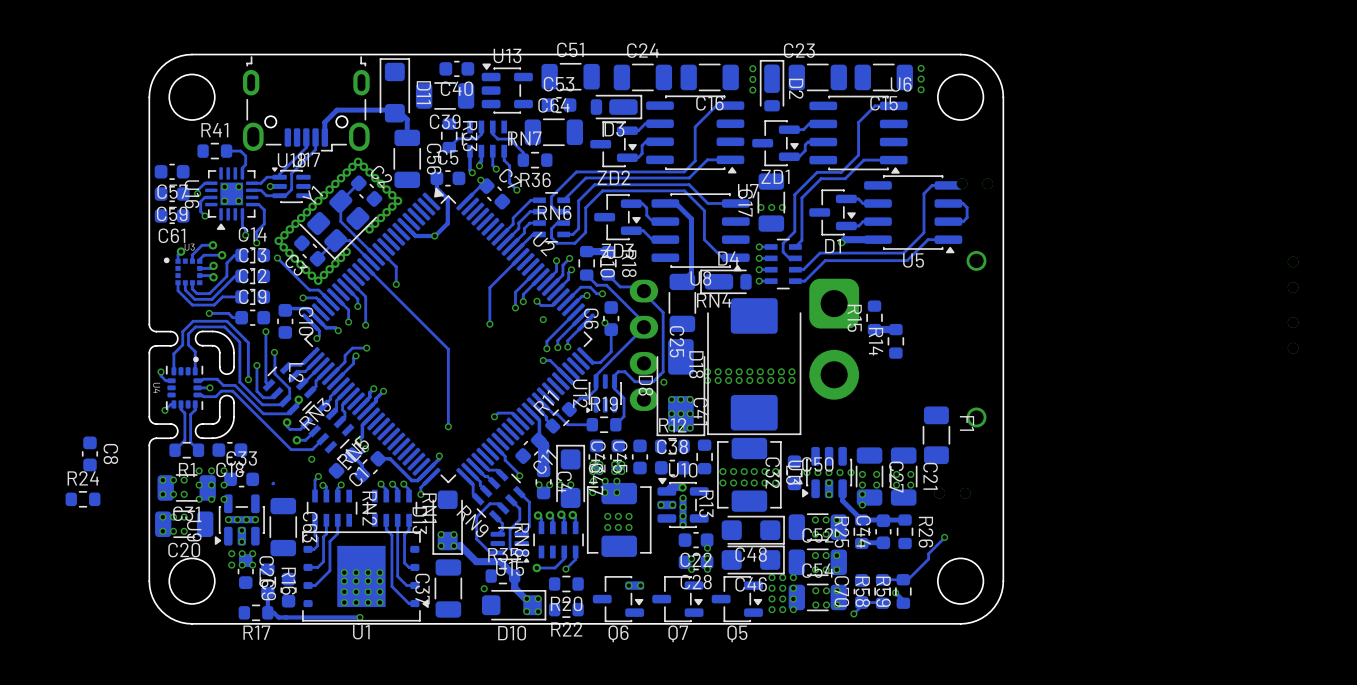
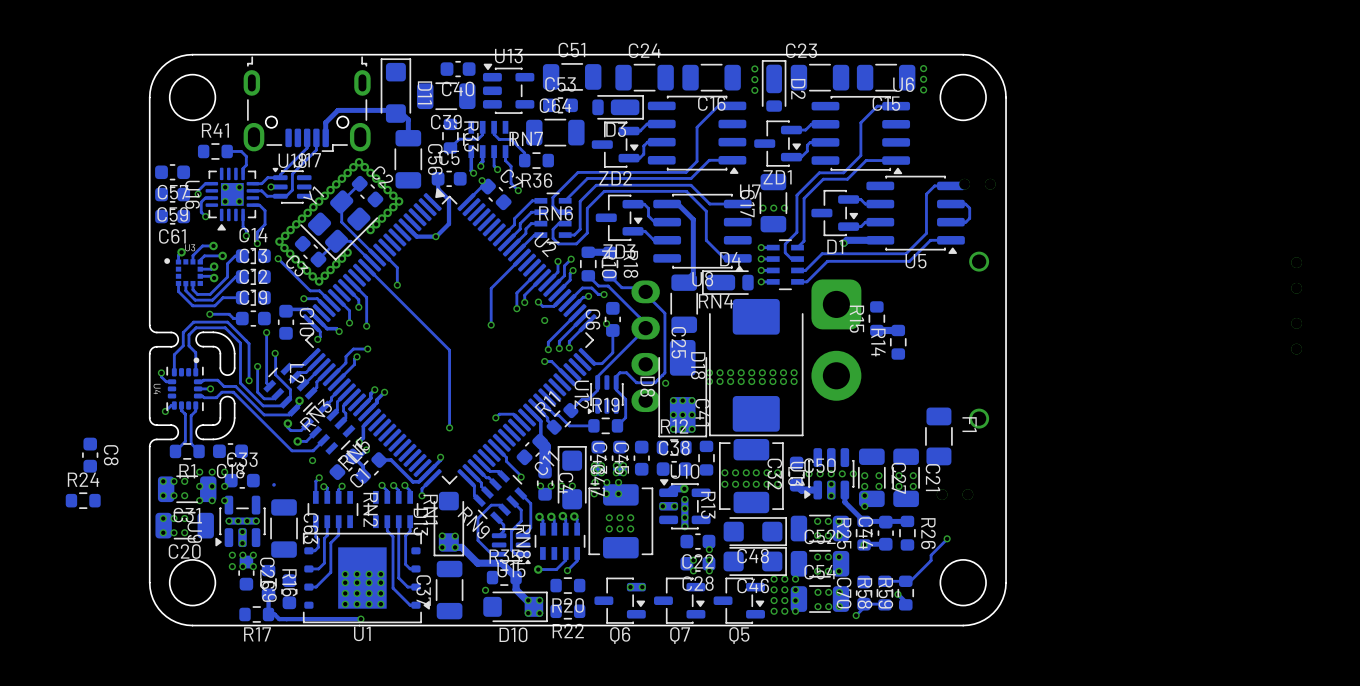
track: none -> (796, 485) (801, 490) (817, 490)

